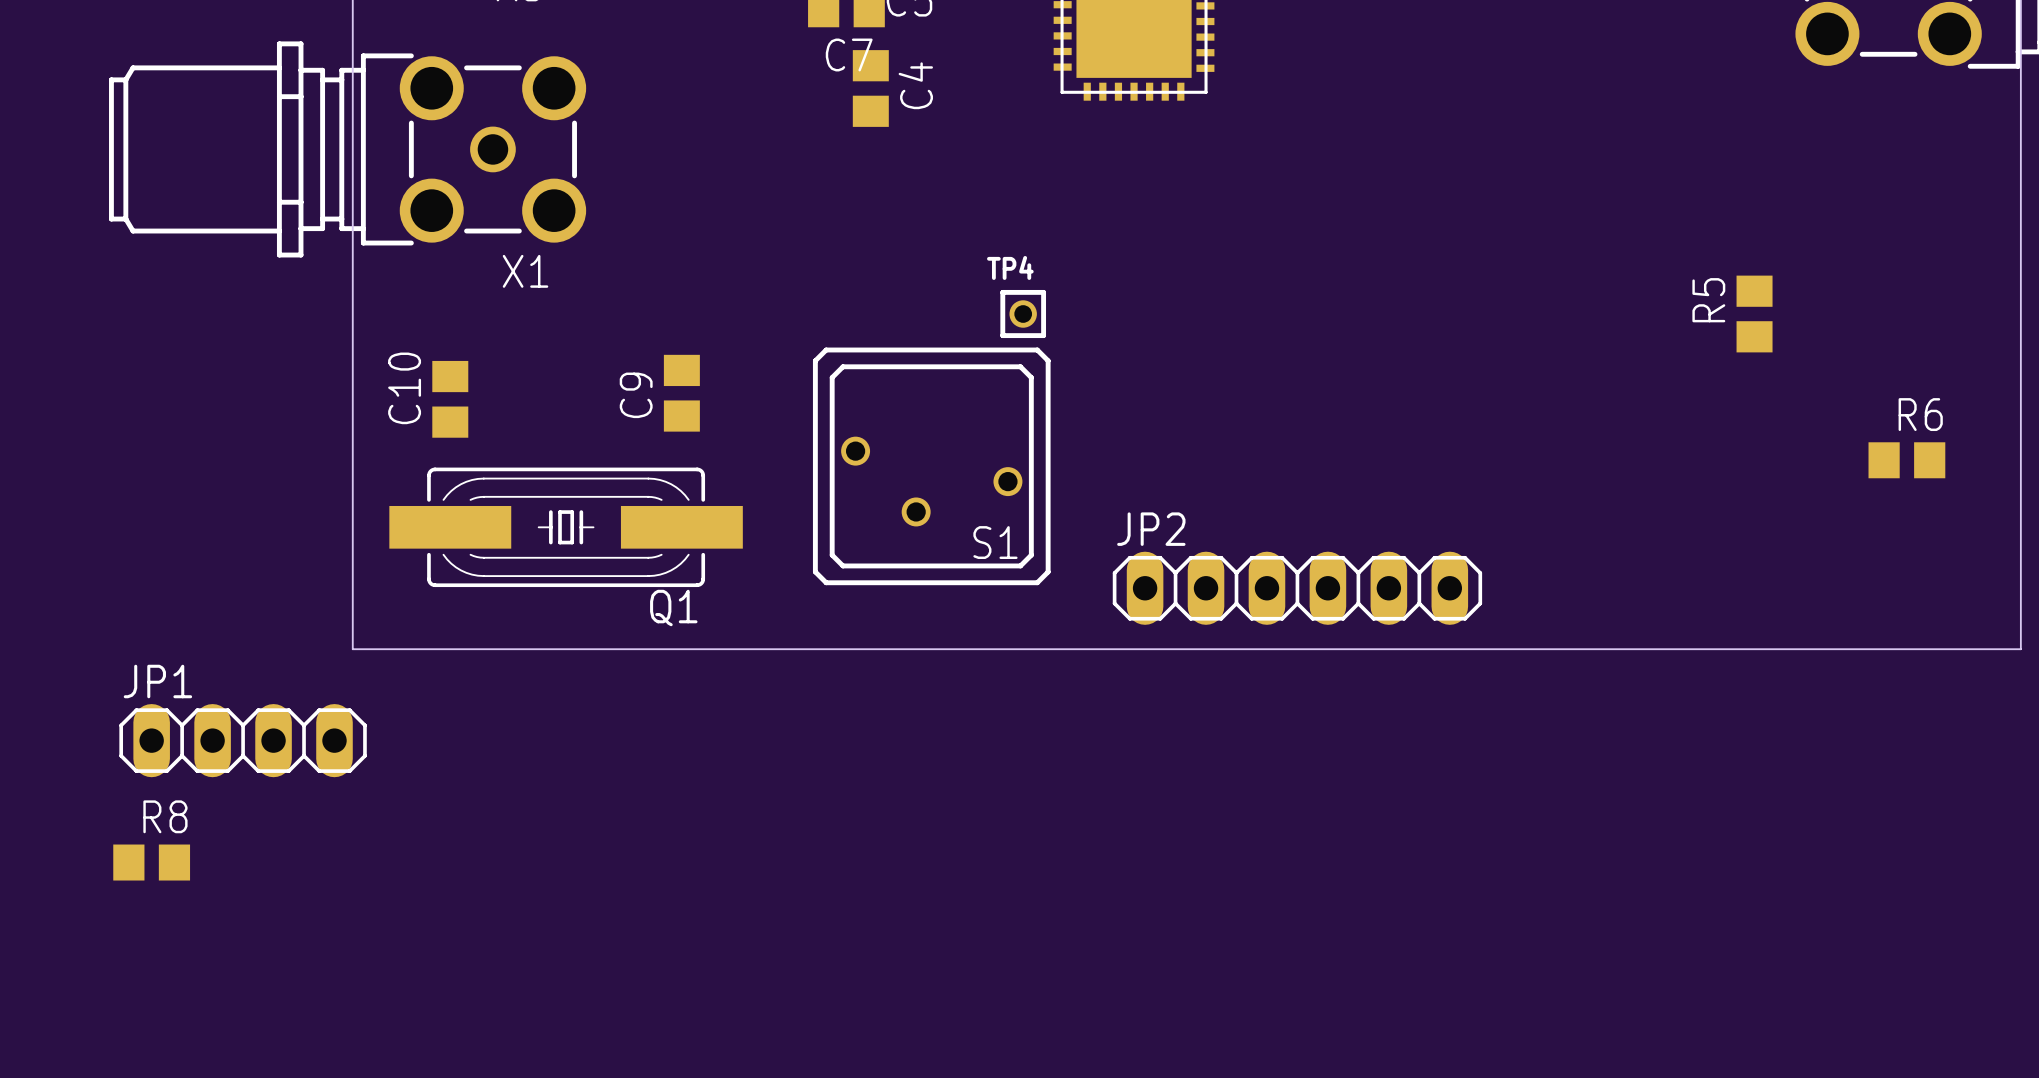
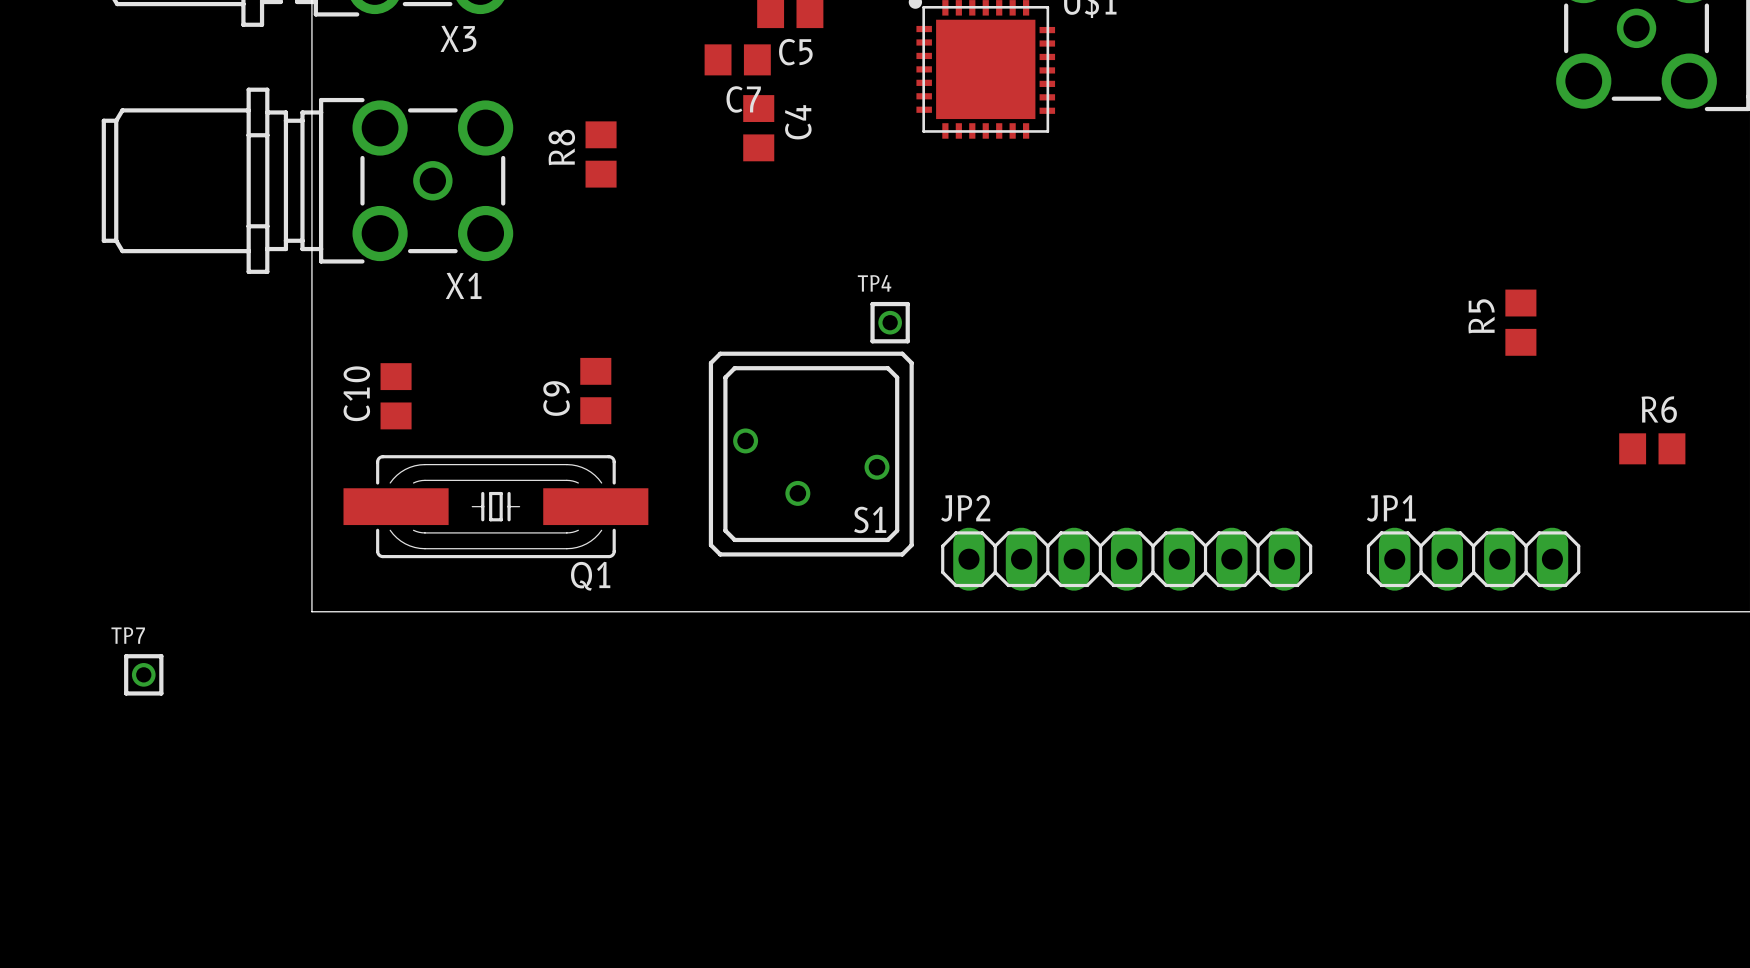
JP2 footprint: [1112, 551, 1483, 625] -> [941, 527, 1313, 591]
TP7: none -> (143, 674)
JP1 position: (243, 740) -> (1473, 559)
R8 name position: R8 (165, 816) -> R8 (561, 147)
R8 rotation: 0° (151, 862) -> 90° clockwise (601, 154)
R8 position: (151, 862) -> (601, 154)

